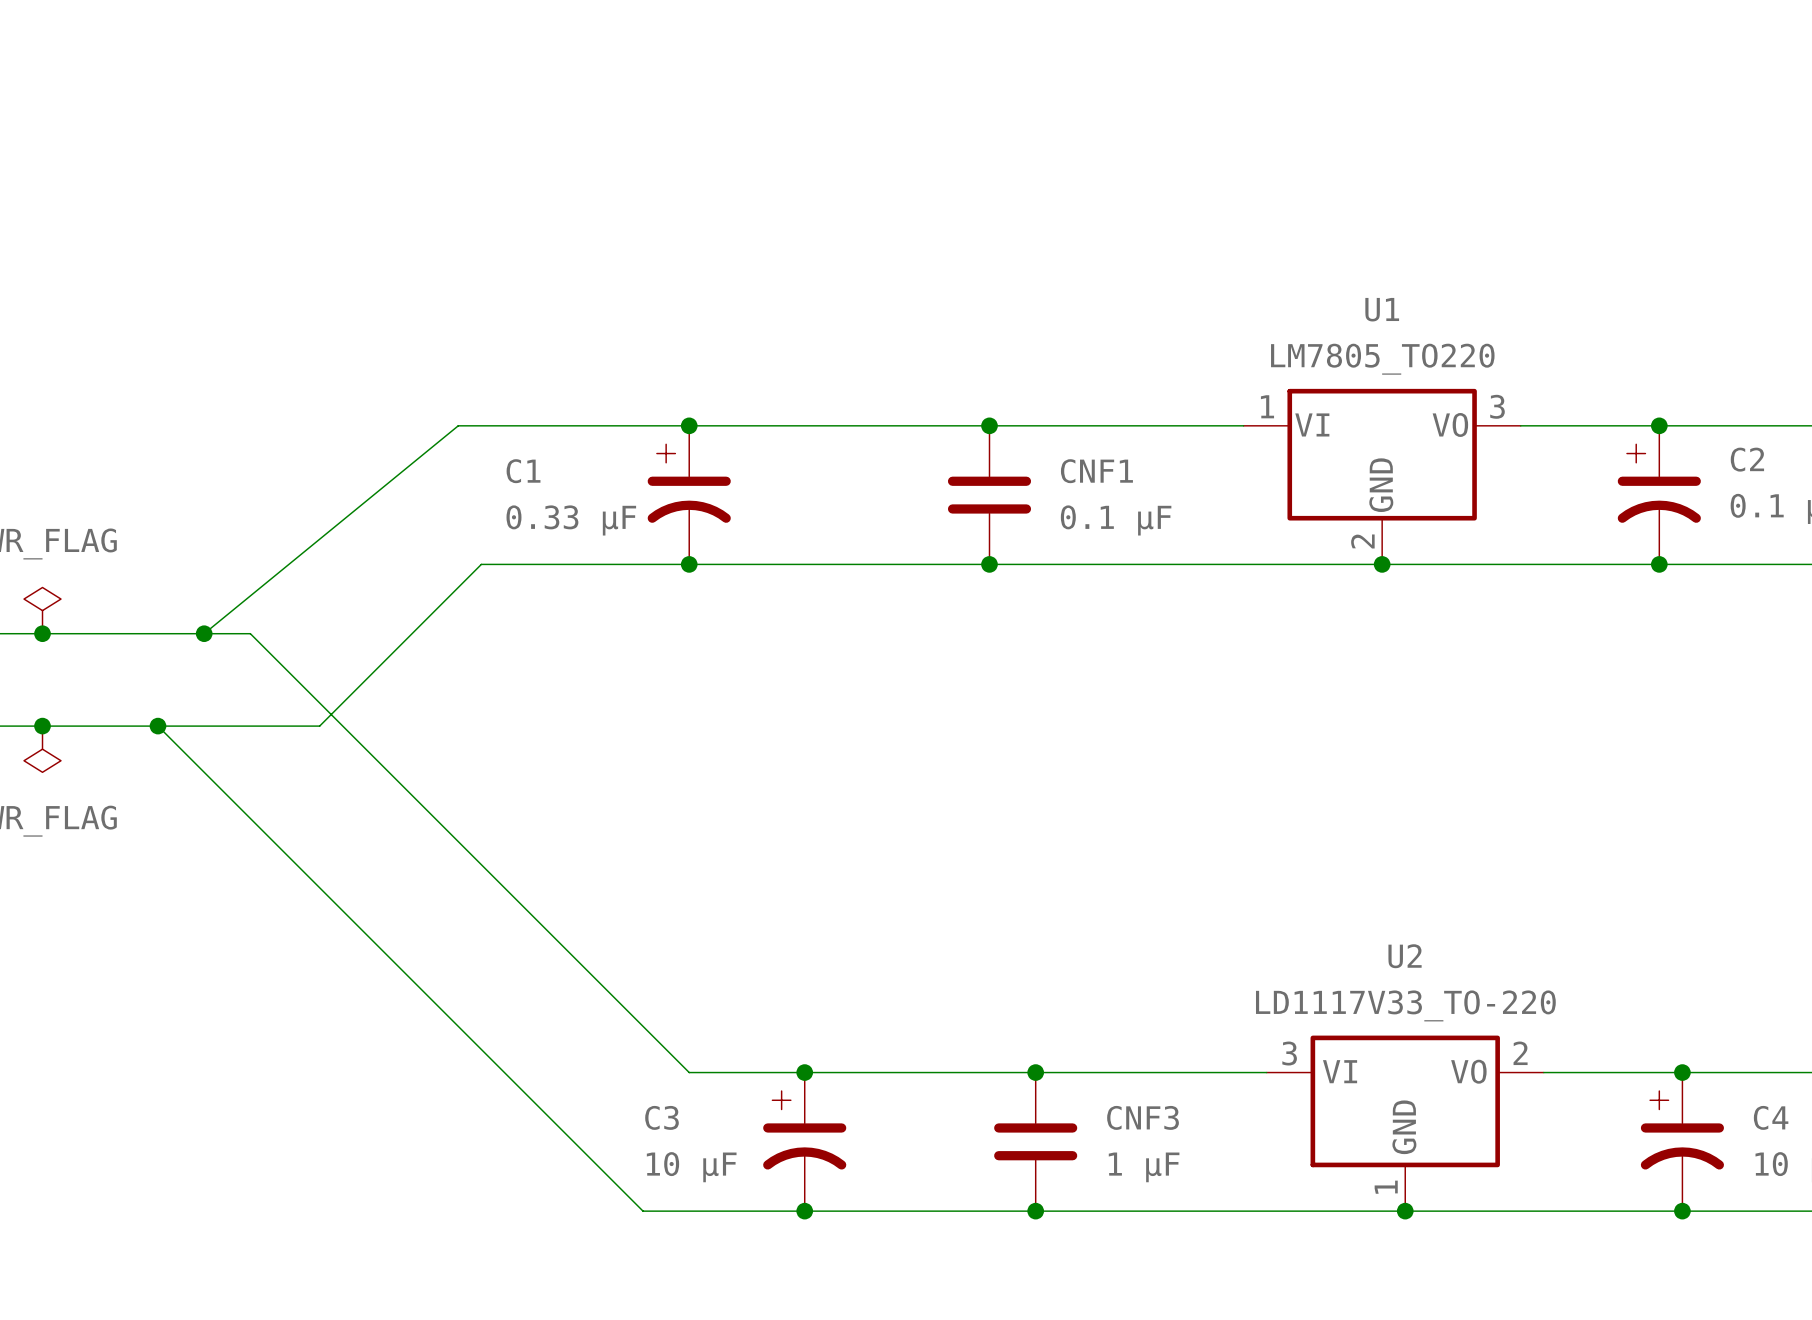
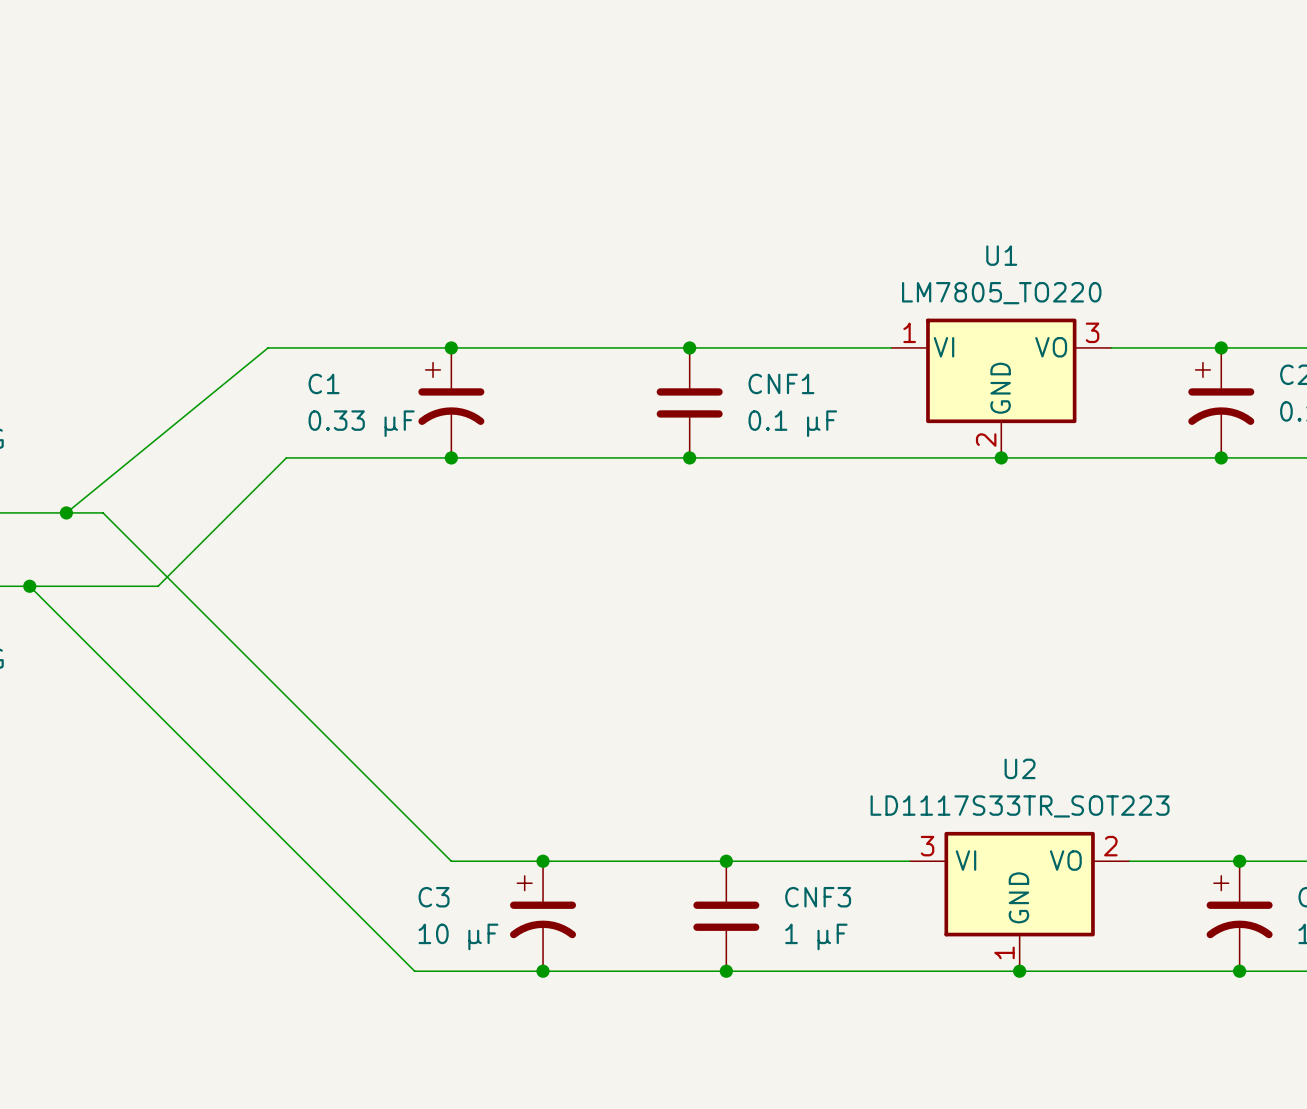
U2 value: LD1117V33_TO-220 (1405, 1005) -> LD1117S33TR_SOT223 (1020, 806)

